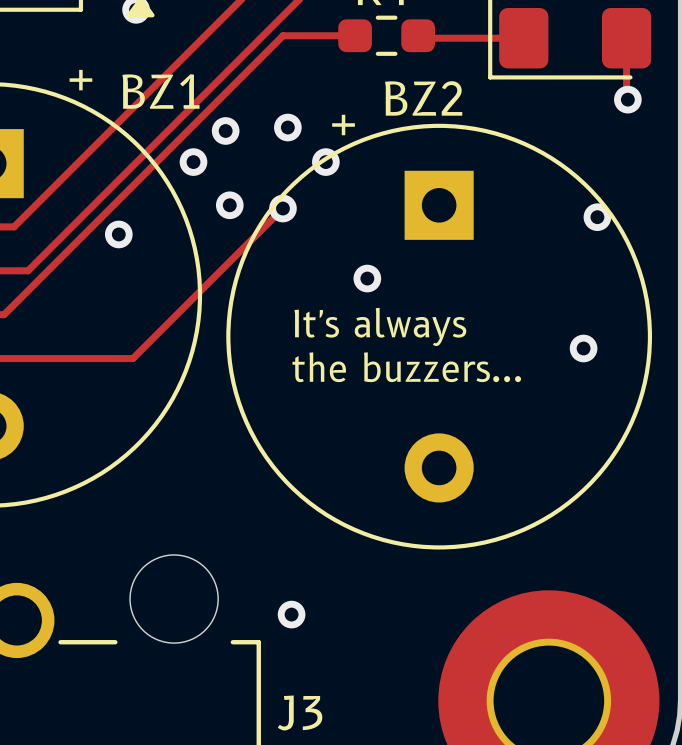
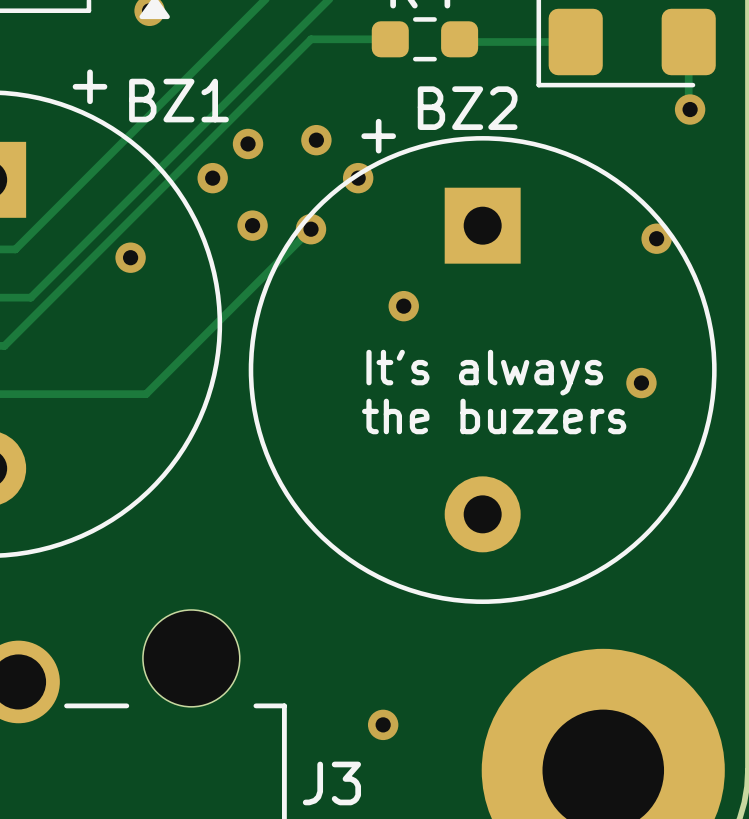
text position: It's always (380, 326) -> It's always (484, 372)
text: the buzzers... (406, 367) -> the buzzers (494, 416)
via position: (291, 614) -> (383, 724)

